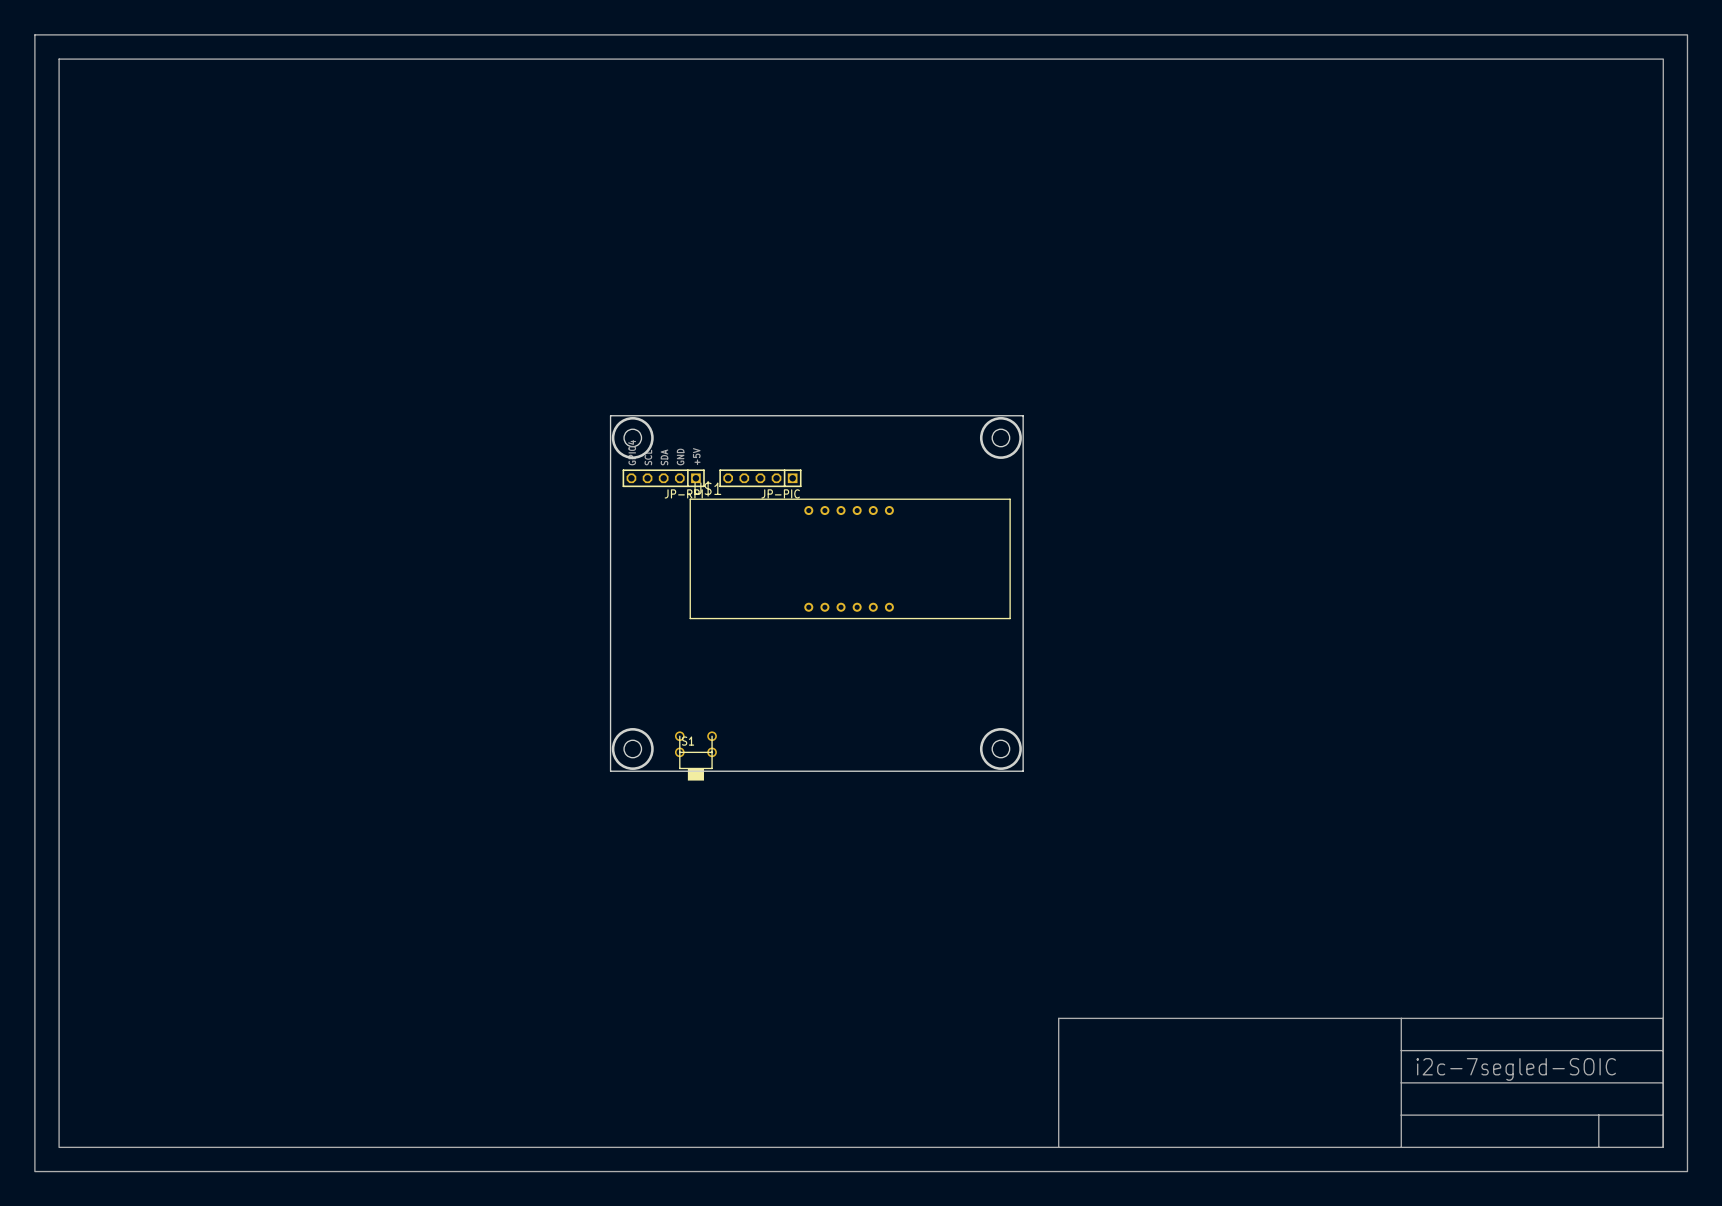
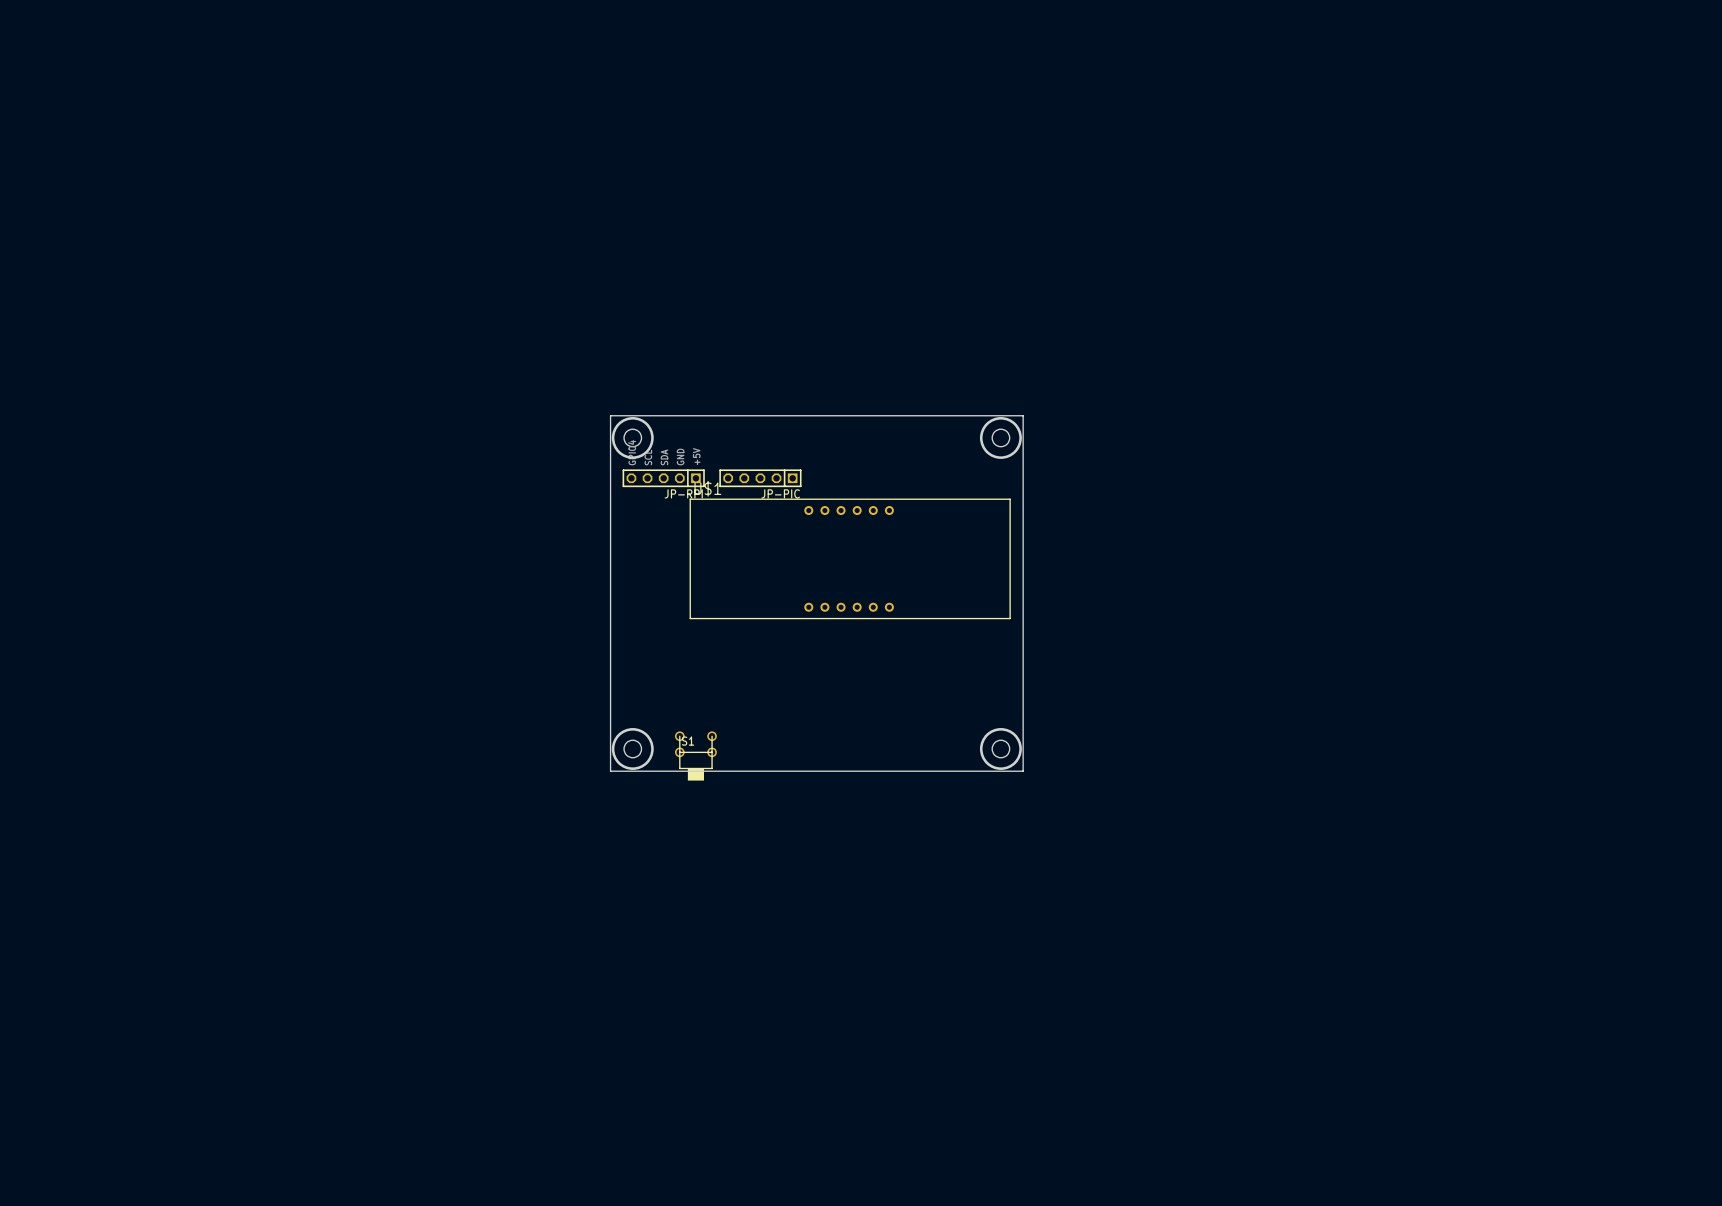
drawing: [34, 34, 1688, 1172] -> none

